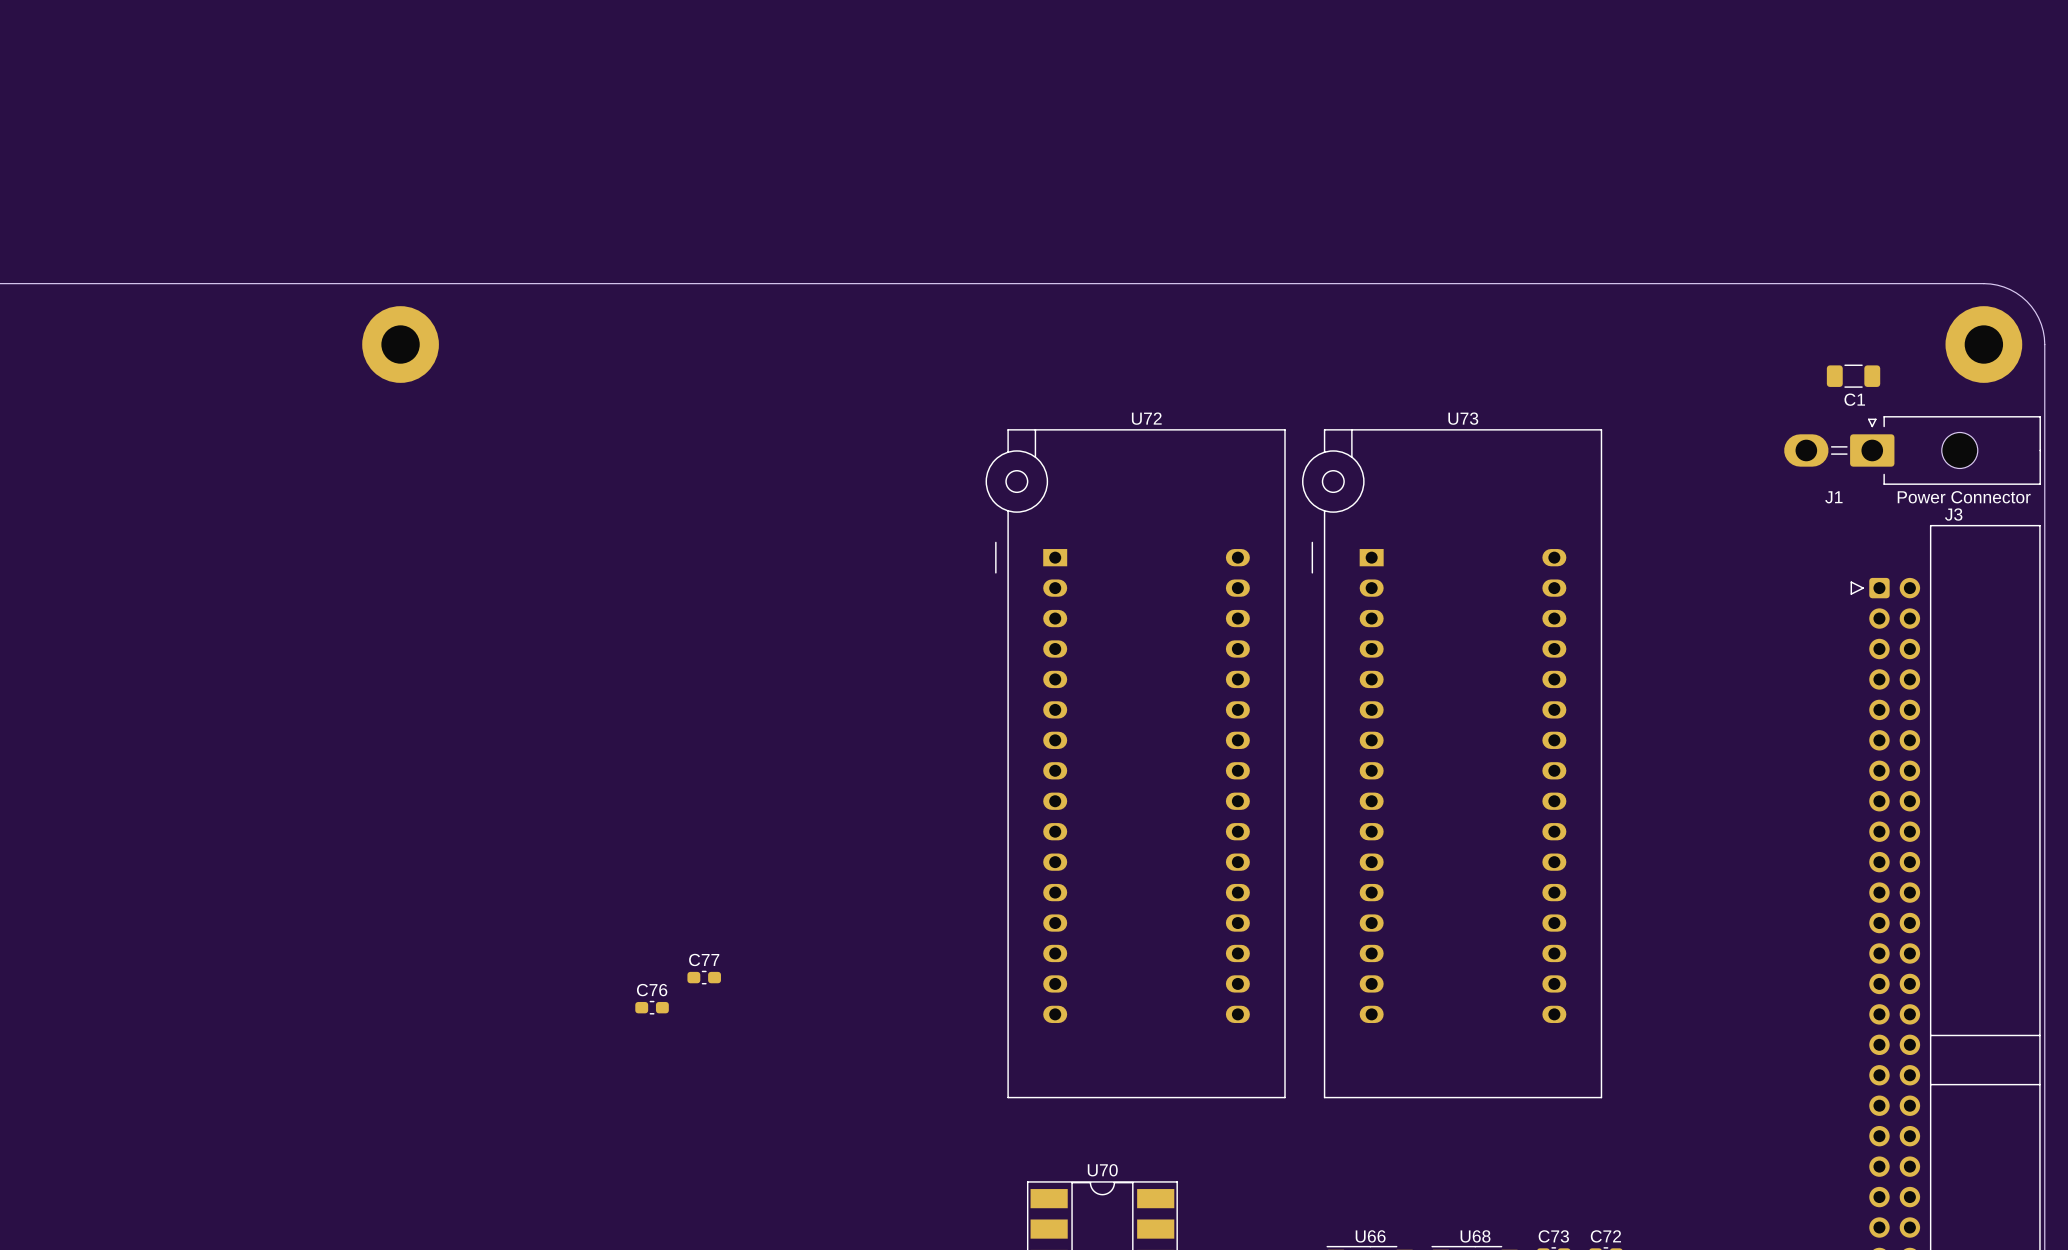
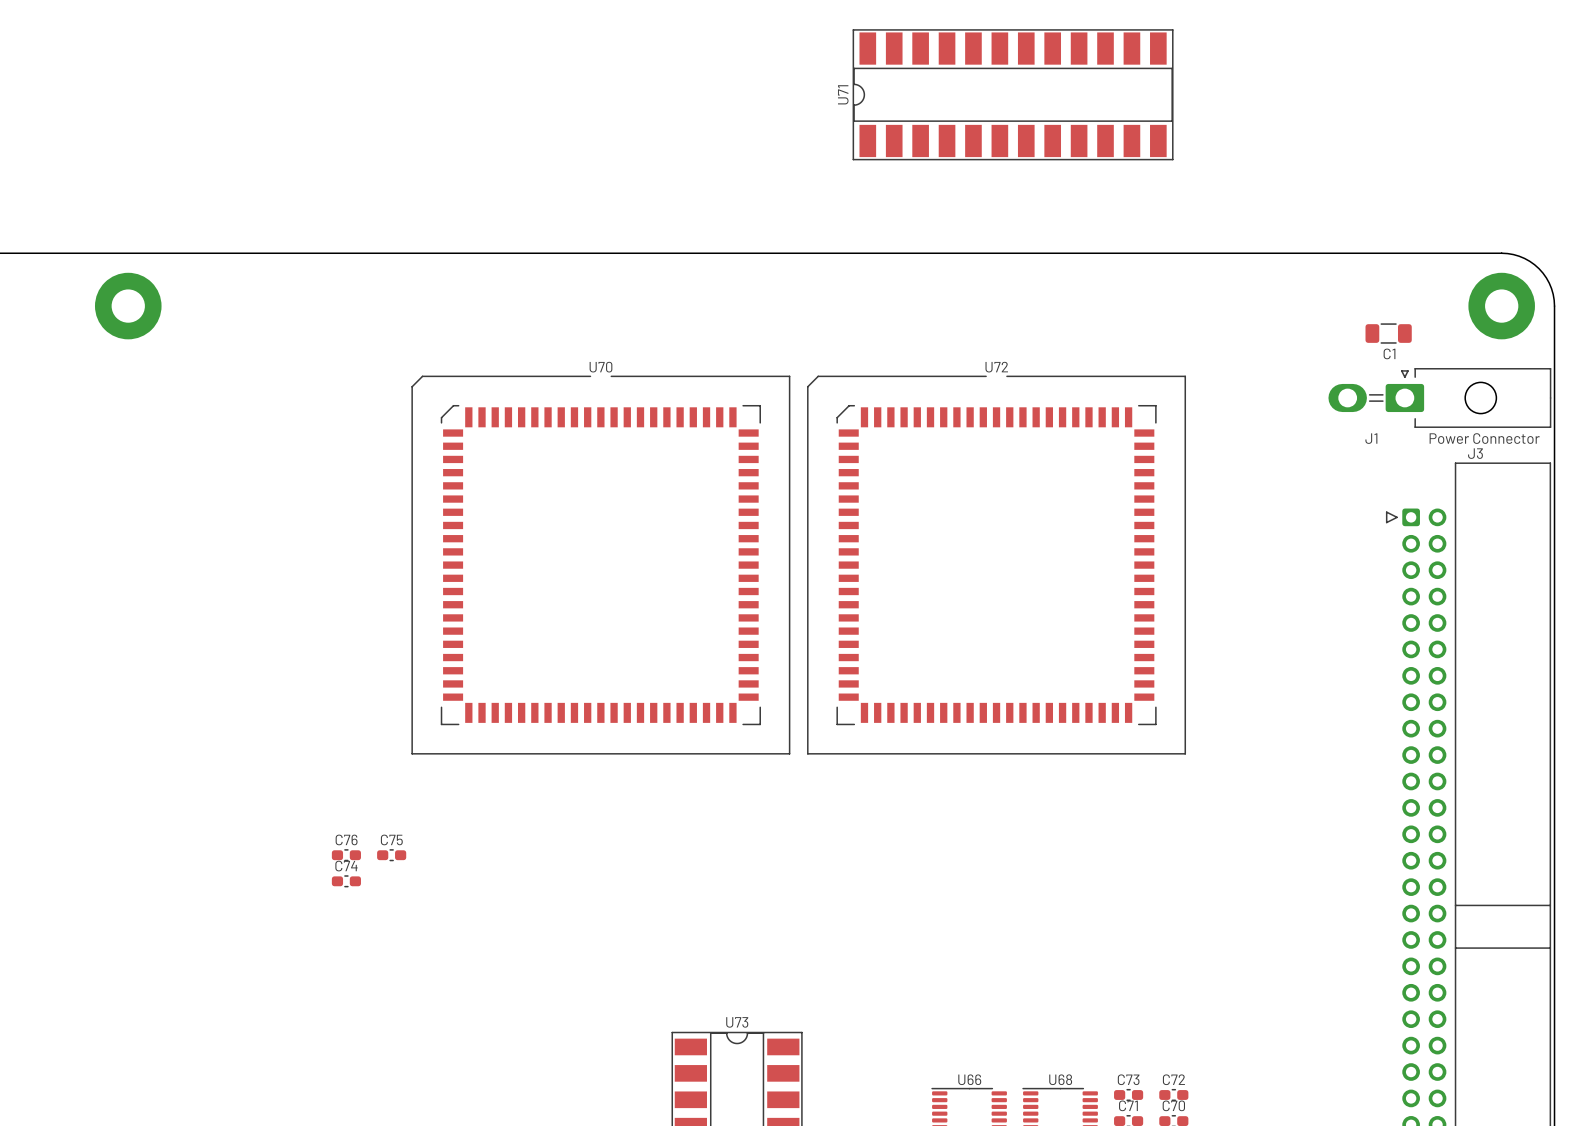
U71: none -> (1013, 94)
U72 name position: U72 (1146, 418) -> U72 (996, 367)
U72 footprint: [985, 429, 1286, 1099] -> [807, 375, 1186, 755]
U70: none -> (600, 565)
U73: (1452, 763) -> none
C77 name: C77 (704, 959) -> C75 (391, 839)
C76: none -> (346, 855)
C76 name: C76 (652, 990) -> C74 (346, 866)
U70 name: U70 (1102, 1170) -> U73 (737, 1022)

